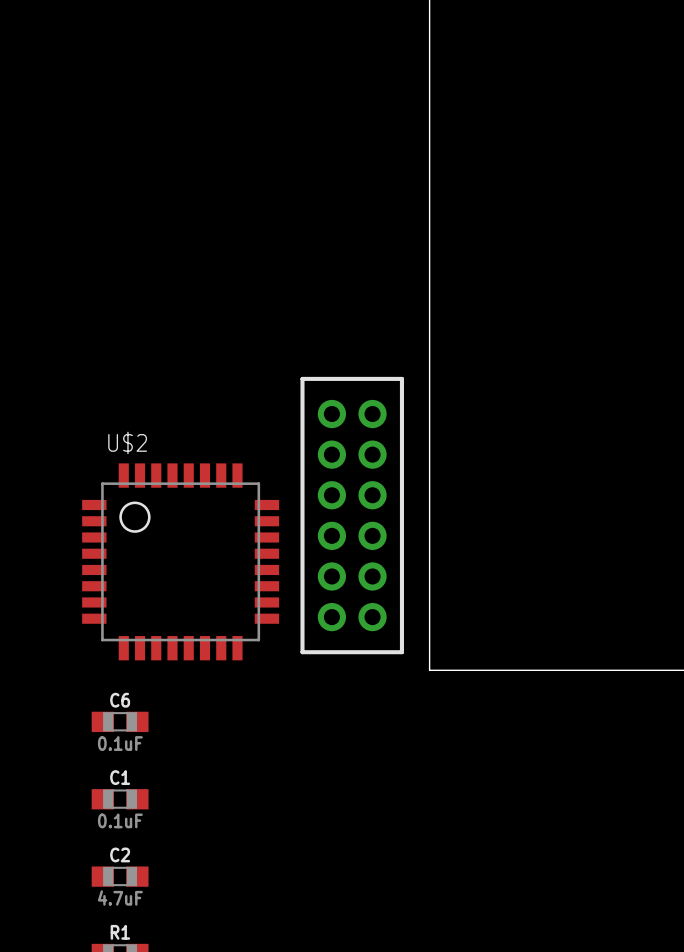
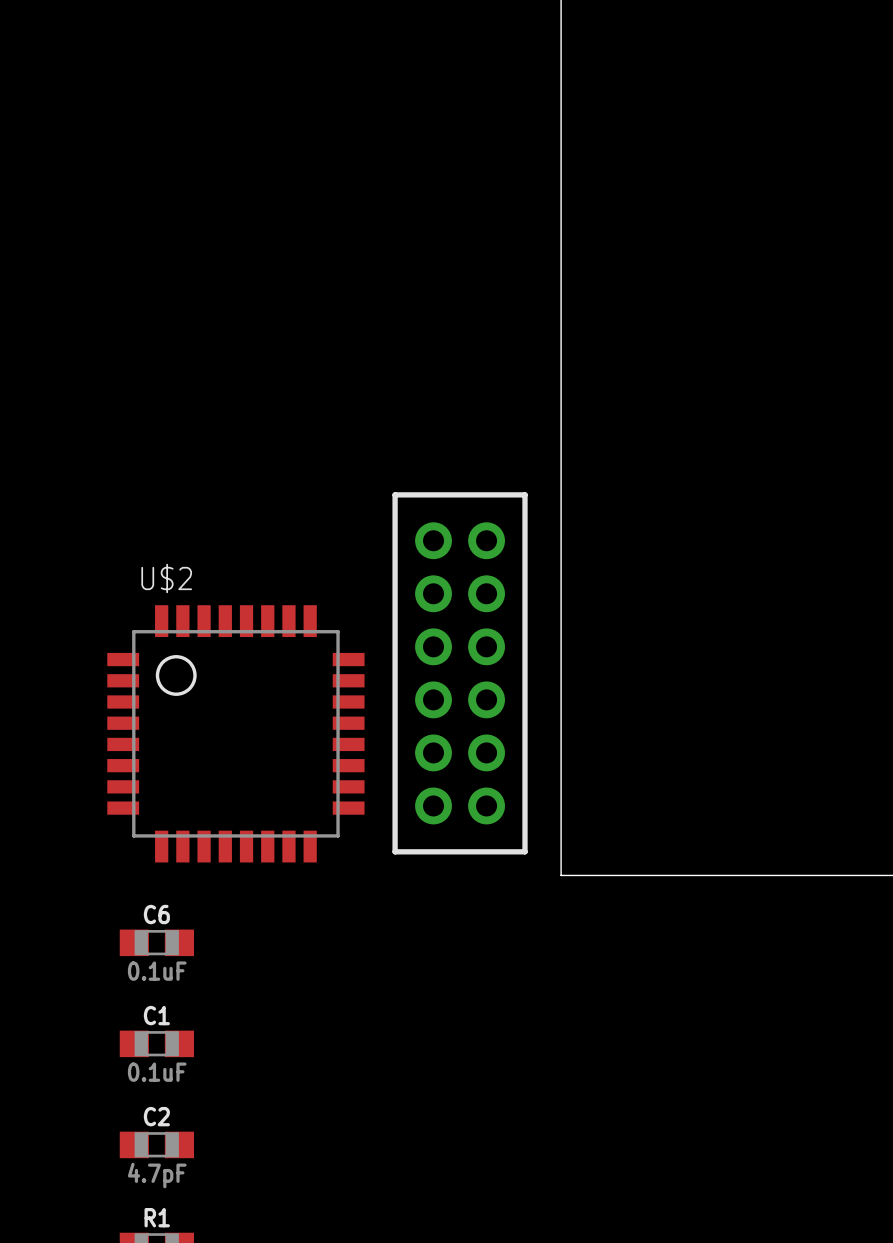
C2 value: 4.7uF (120, 897) -> 4.7pF (157, 1175)

